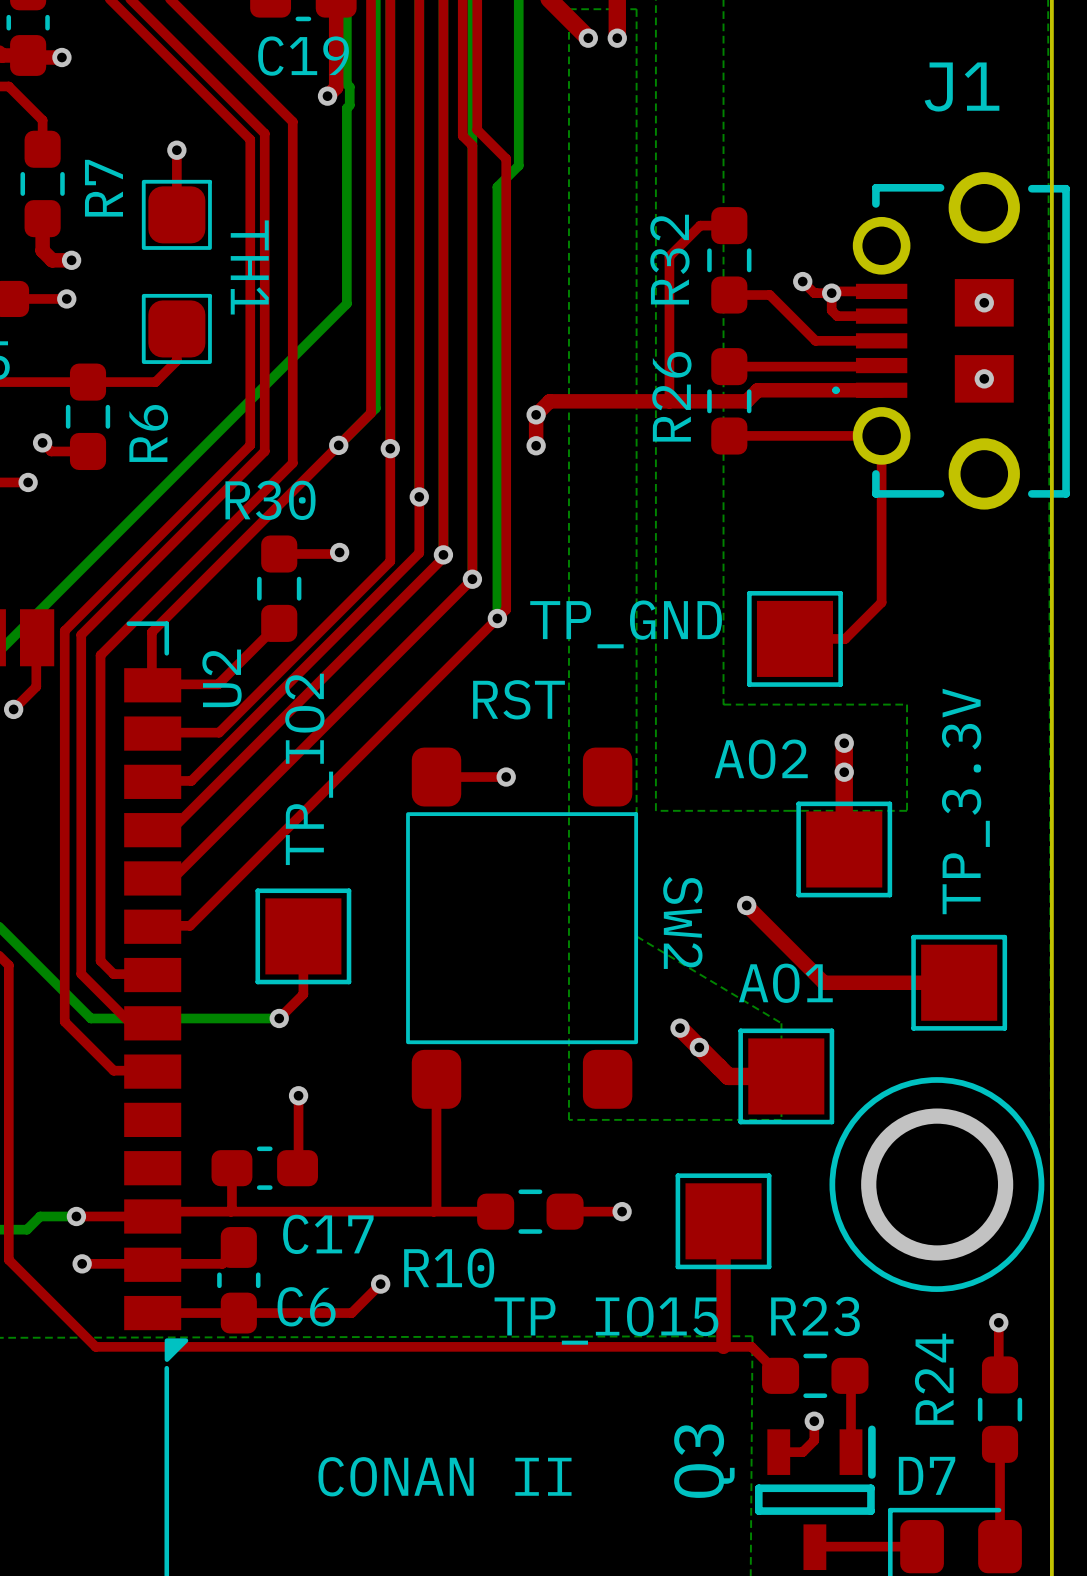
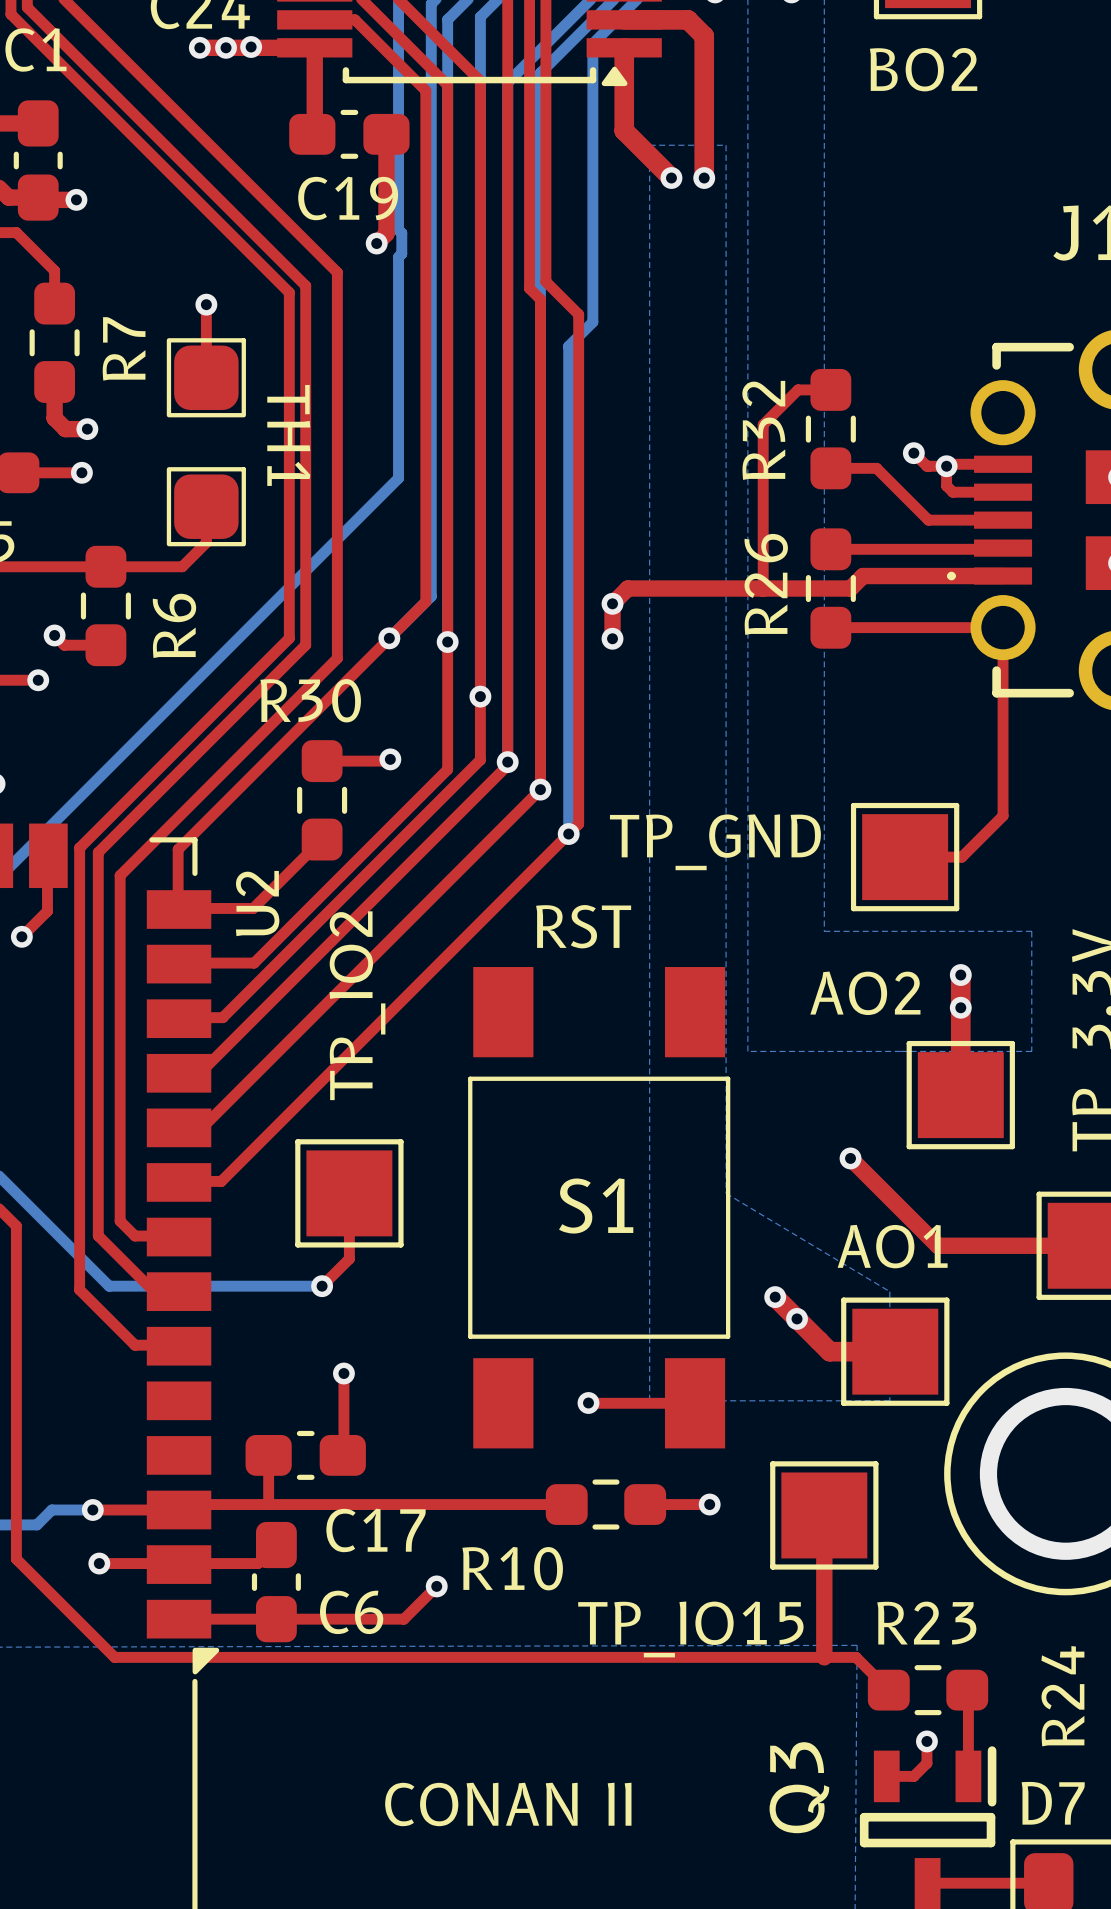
text: none -> RST (583, 926)
top track: (436, 777) (506, 777) -> none
via: (506, 777) -> none
SW2: RST (522, 928) -> none
S1: none -> (599, 1207)
top track: (436, 1079) (436, 1208) (433, 1211) -> none
via: none -> (588, 1402)
top track: none -> (588, 1403) (695, 1403)

